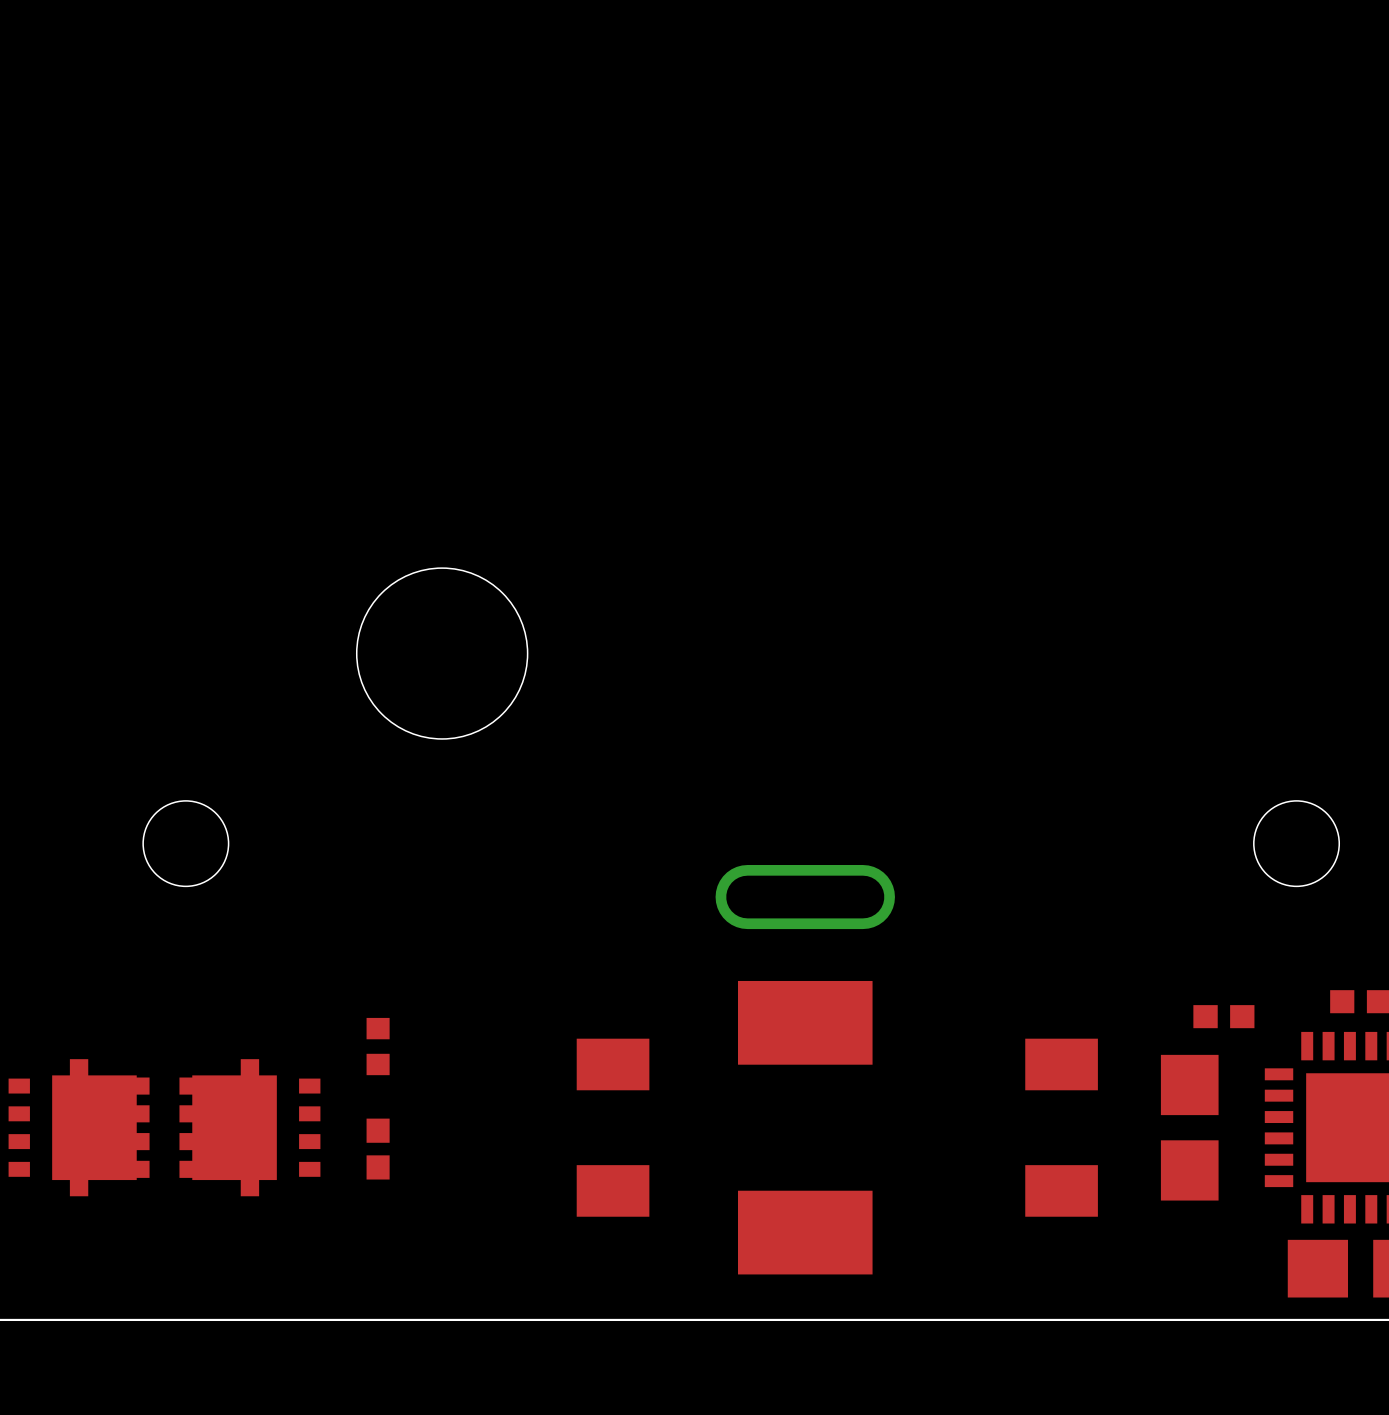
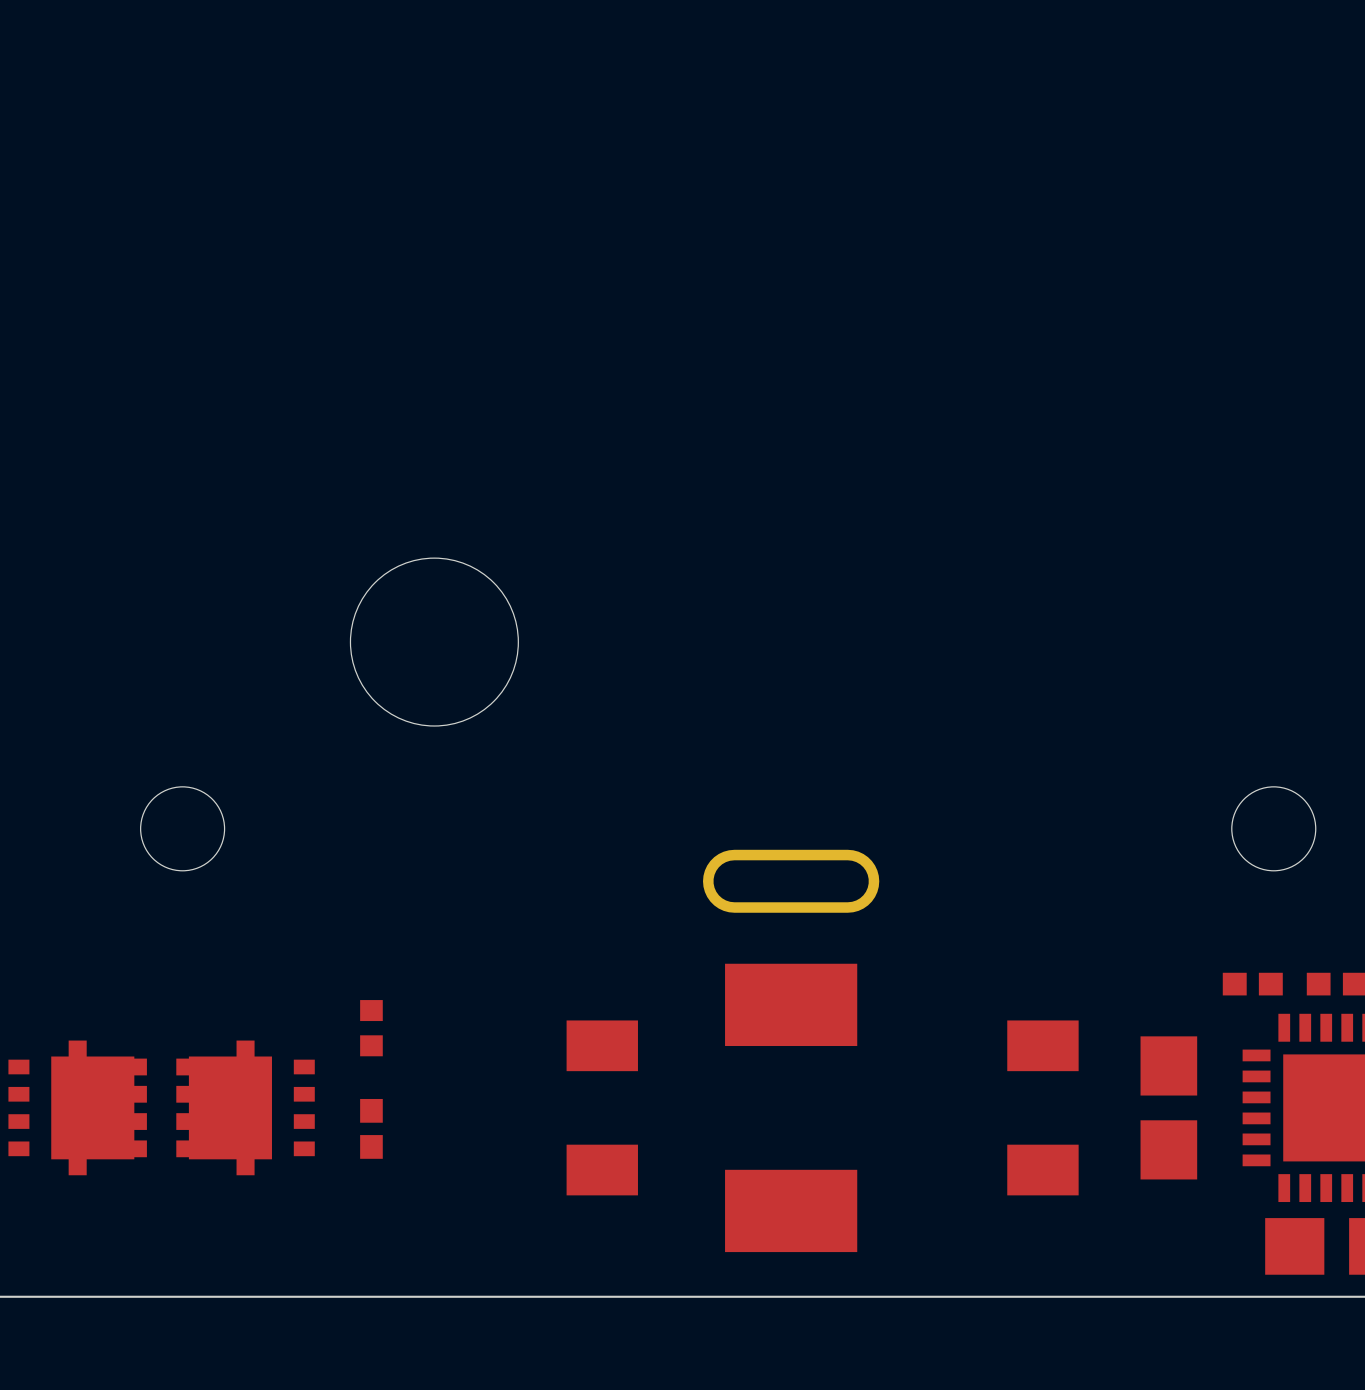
part position: (1223, 1016) -> (1252, 984)

